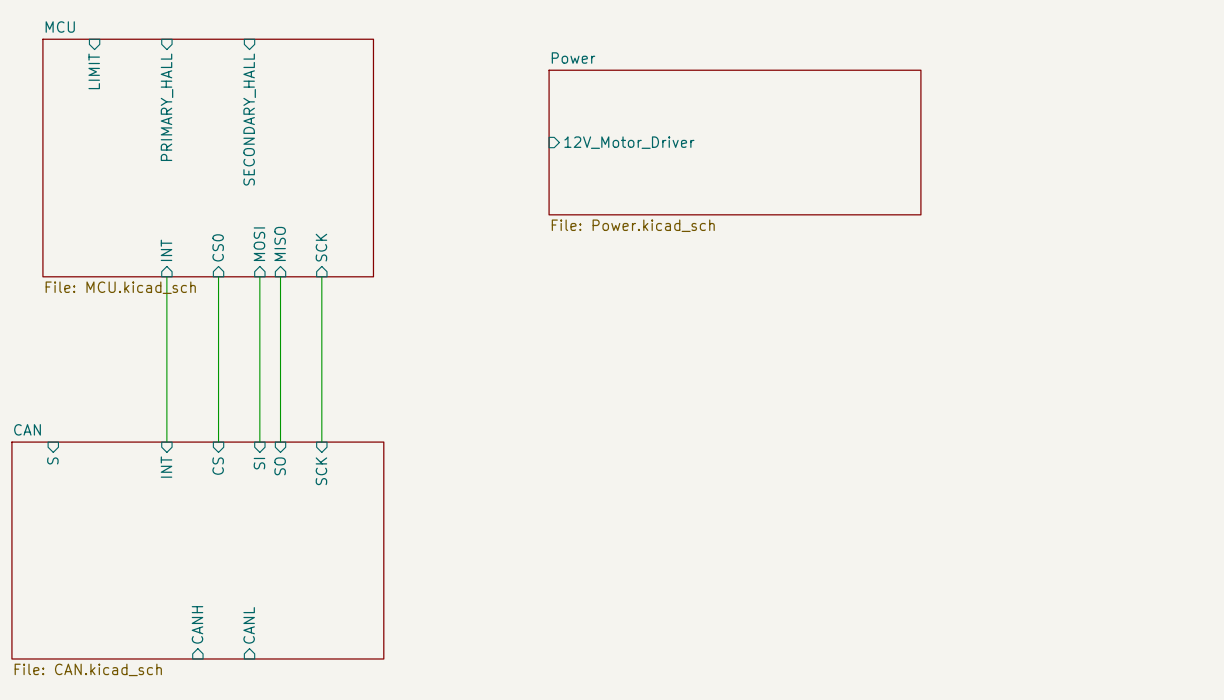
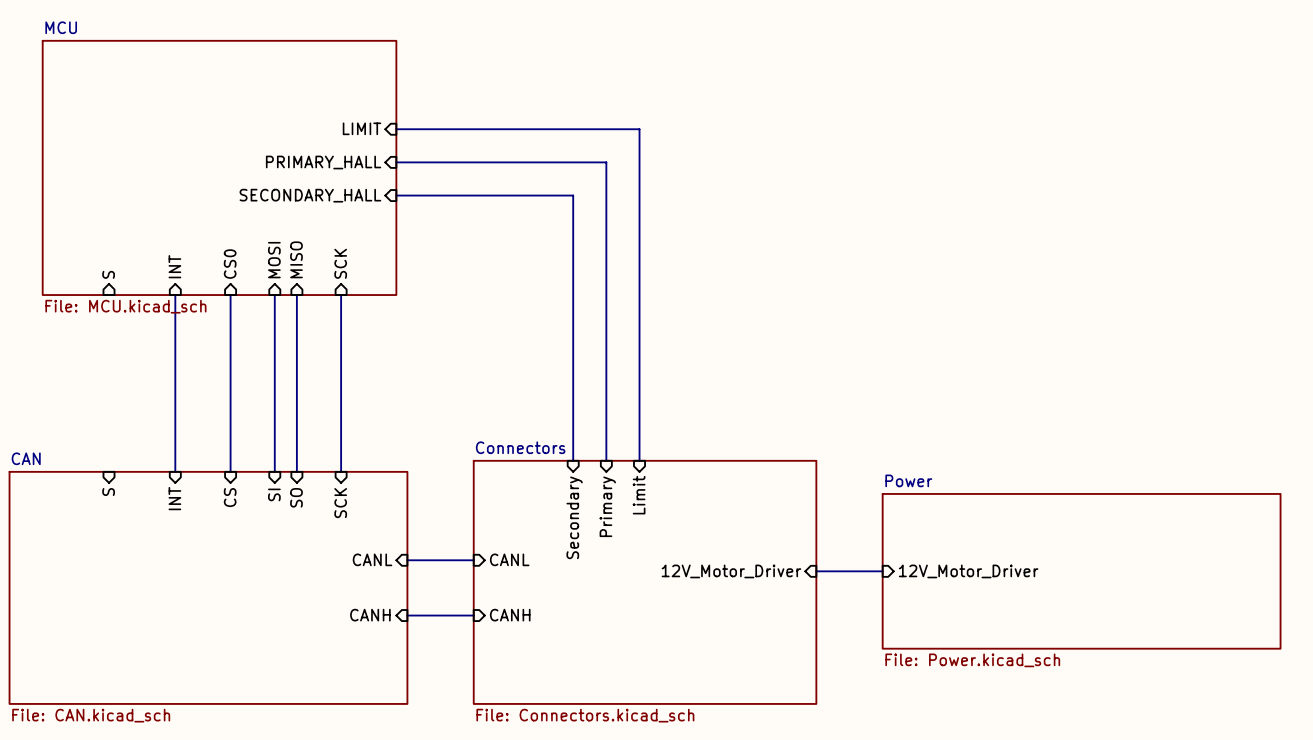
sheet pin: LIMIT (94, 71) -> none
sheet pin: PRIMARY_HALL (166, 107) -> none
sheet pin rotation: 0° (249, 119) -> 90° clockwise (310, 195)
sheet pin: none -> LIMIT (361, 128)
wire: none -> (396, 129) (639, 129) (639, 460)
sheet pin: 12V_Motor_Driver (629, 142) -> none
sheet Power: File: Power.kicad_sch (734, 142) -> none
sheet pin: none -> PRIMARY_HALL (323, 162)
wire: none -> (396, 162) (606, 162) (606, 460)
wire: none -> (396, 195) (573, 195) (573, 460)
sheet pin: none -> S (108, 274)
sheet pin position: S (52, 460) -> S (108, 492)
sheet pin: none -> Limit (639, 495)
sheet pin: none -> Primary (607, 506)
sheet pin: none -> Secondary (574, 517)
sheet pin: none -> CANL (372, 559)
wire: none -> (407, 560) (473, 560)
sheet pin: none -> CANL (509, 559)
sheet pin: none -> 12V_Motor_Driver (731, 571)
wire: none -> (816, 571) (882, 571)
sheet pin: none -> 12V_Motor_Driver (968, 571)
sheet Power: none -> File: Power.kicad_sch (1081, 571)
sheet Connectors: none -> File: Connectors.kicad_sch (645, 582)
sheet pin: none -> CANH (370, 615)
sheet pin: none -> CANH (510, 615)
wire: none -> (407, 615) (473, 615)
sheet pin: CANH (197, 624) -> none
sheet pin: CANL (249, 625) -> none

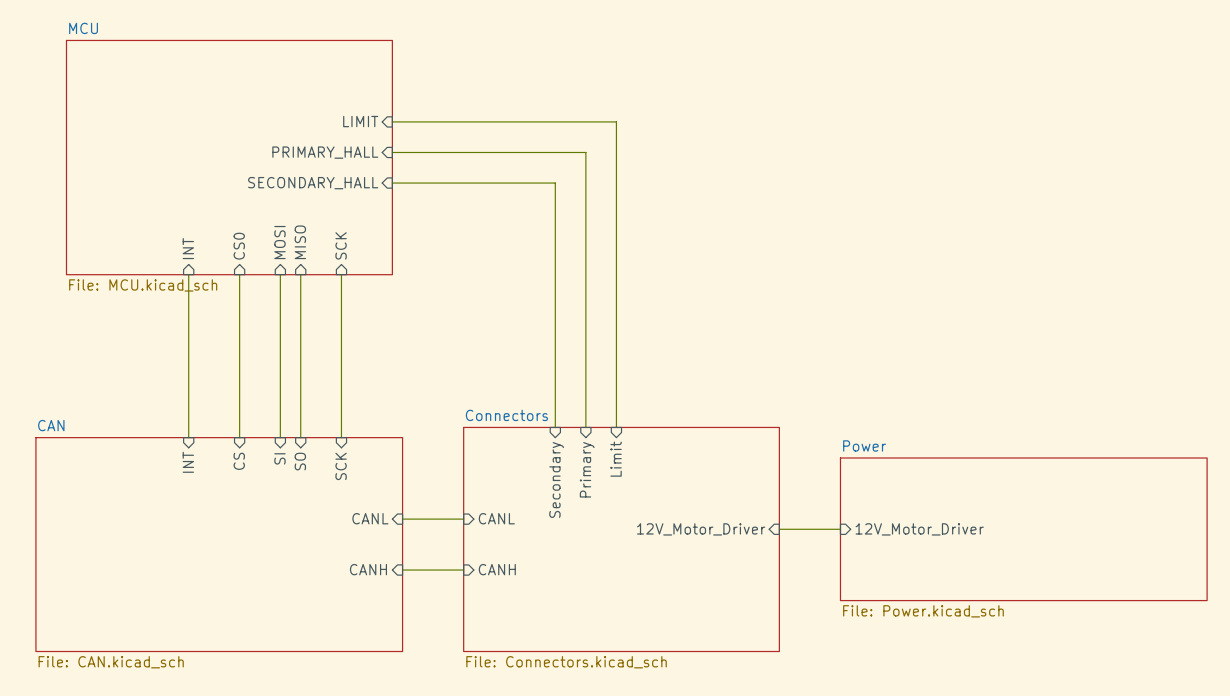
sheet pin: S (108, 274) -> none
sheet pin: S (108, 492) -> none

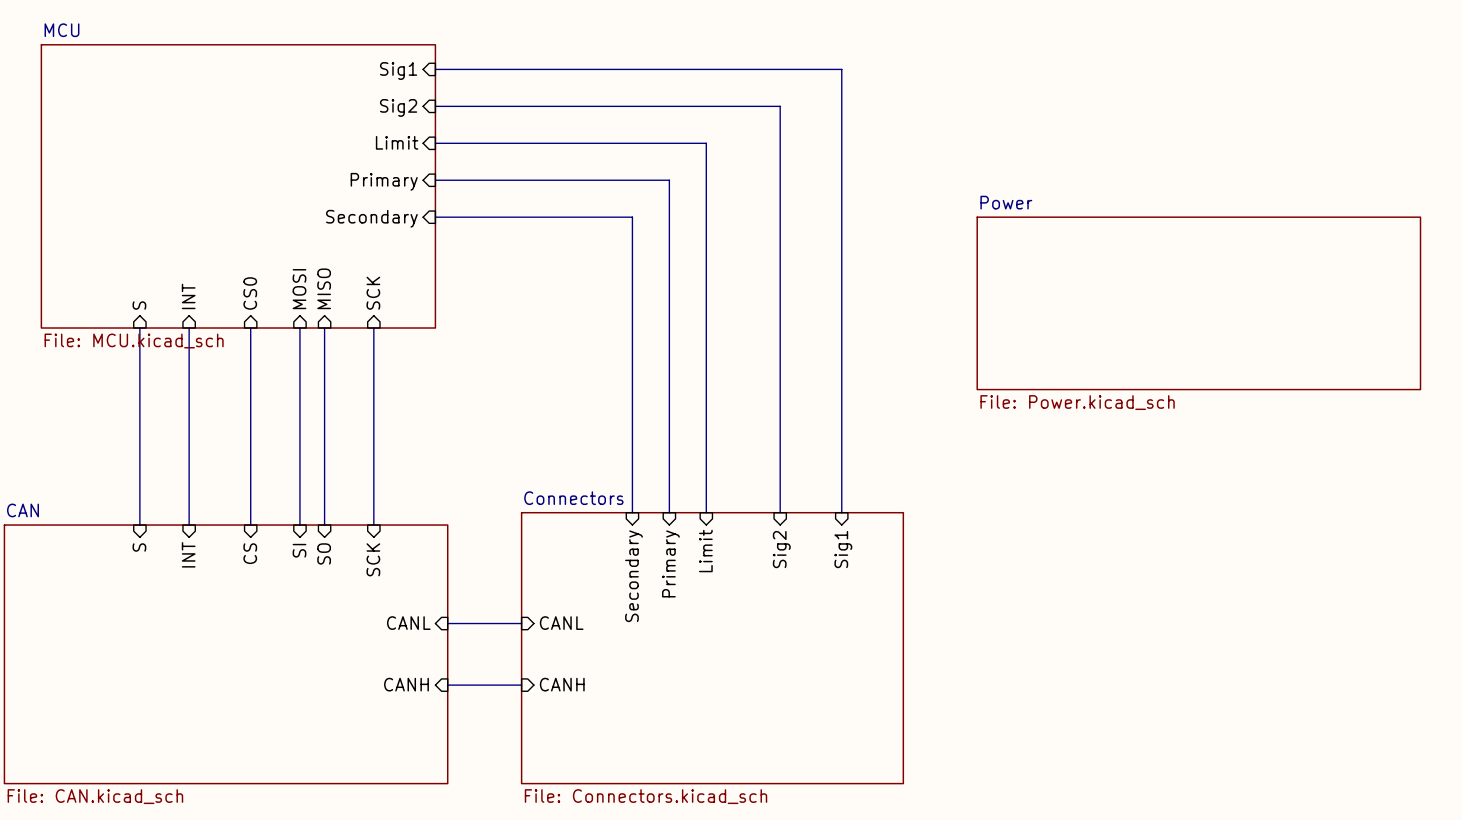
wire: none -> (435, 69) (841, 69) (841, 512)
sheet pin: none -> Sig1 (398, 71)
wire: none -> (435, 106) (780, 106) (780, 512)
sheet pin: none -> Sig2 (398, 107)
sheet pin: LIMIT (360, 121) -> Limit (397, 142)
sheet pin: PRIMARY_HALL (325, 152) -> Primary (384, 181)
sheet pin: SECONDARY_HALL (313, 183) -> Secondary (371, 218)
sheet Power: none -> File: Power.kicad_sch (1198, 303)
sheet pin: none -> S (139, 305)
wire: none -> (139, 328) (139, 525)
sheet pin: none -> S (139, 547)
sheet pin: none -> Sig2 (781, 549)
sheet pin: none -> Sig1 (843, 549)
sheet pin: 12V_Motor_Driver (701, 529) -> none
wire: (779, 529) (840, 529) -> none
sheet pin: 12V_Motor_Driver (919, 529) -> none
sheet Power: File: Power.kicad_sch (1023, 529) -> none

